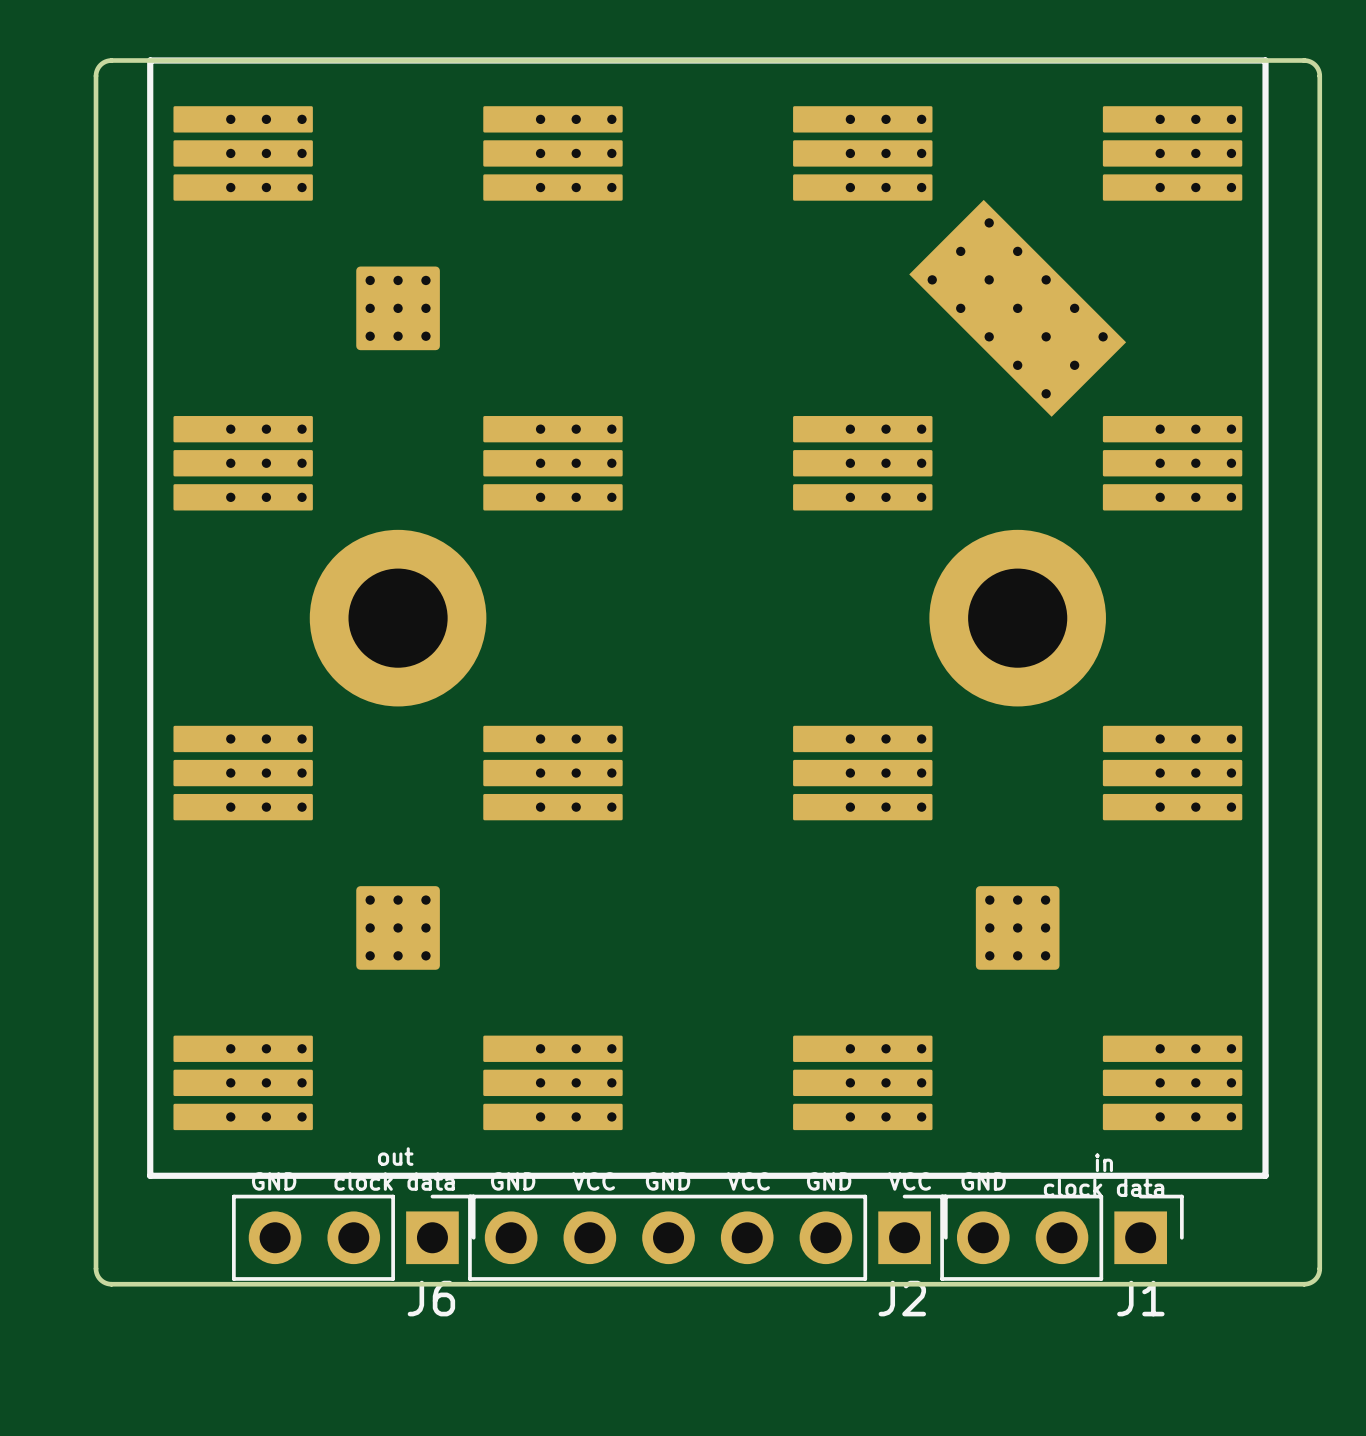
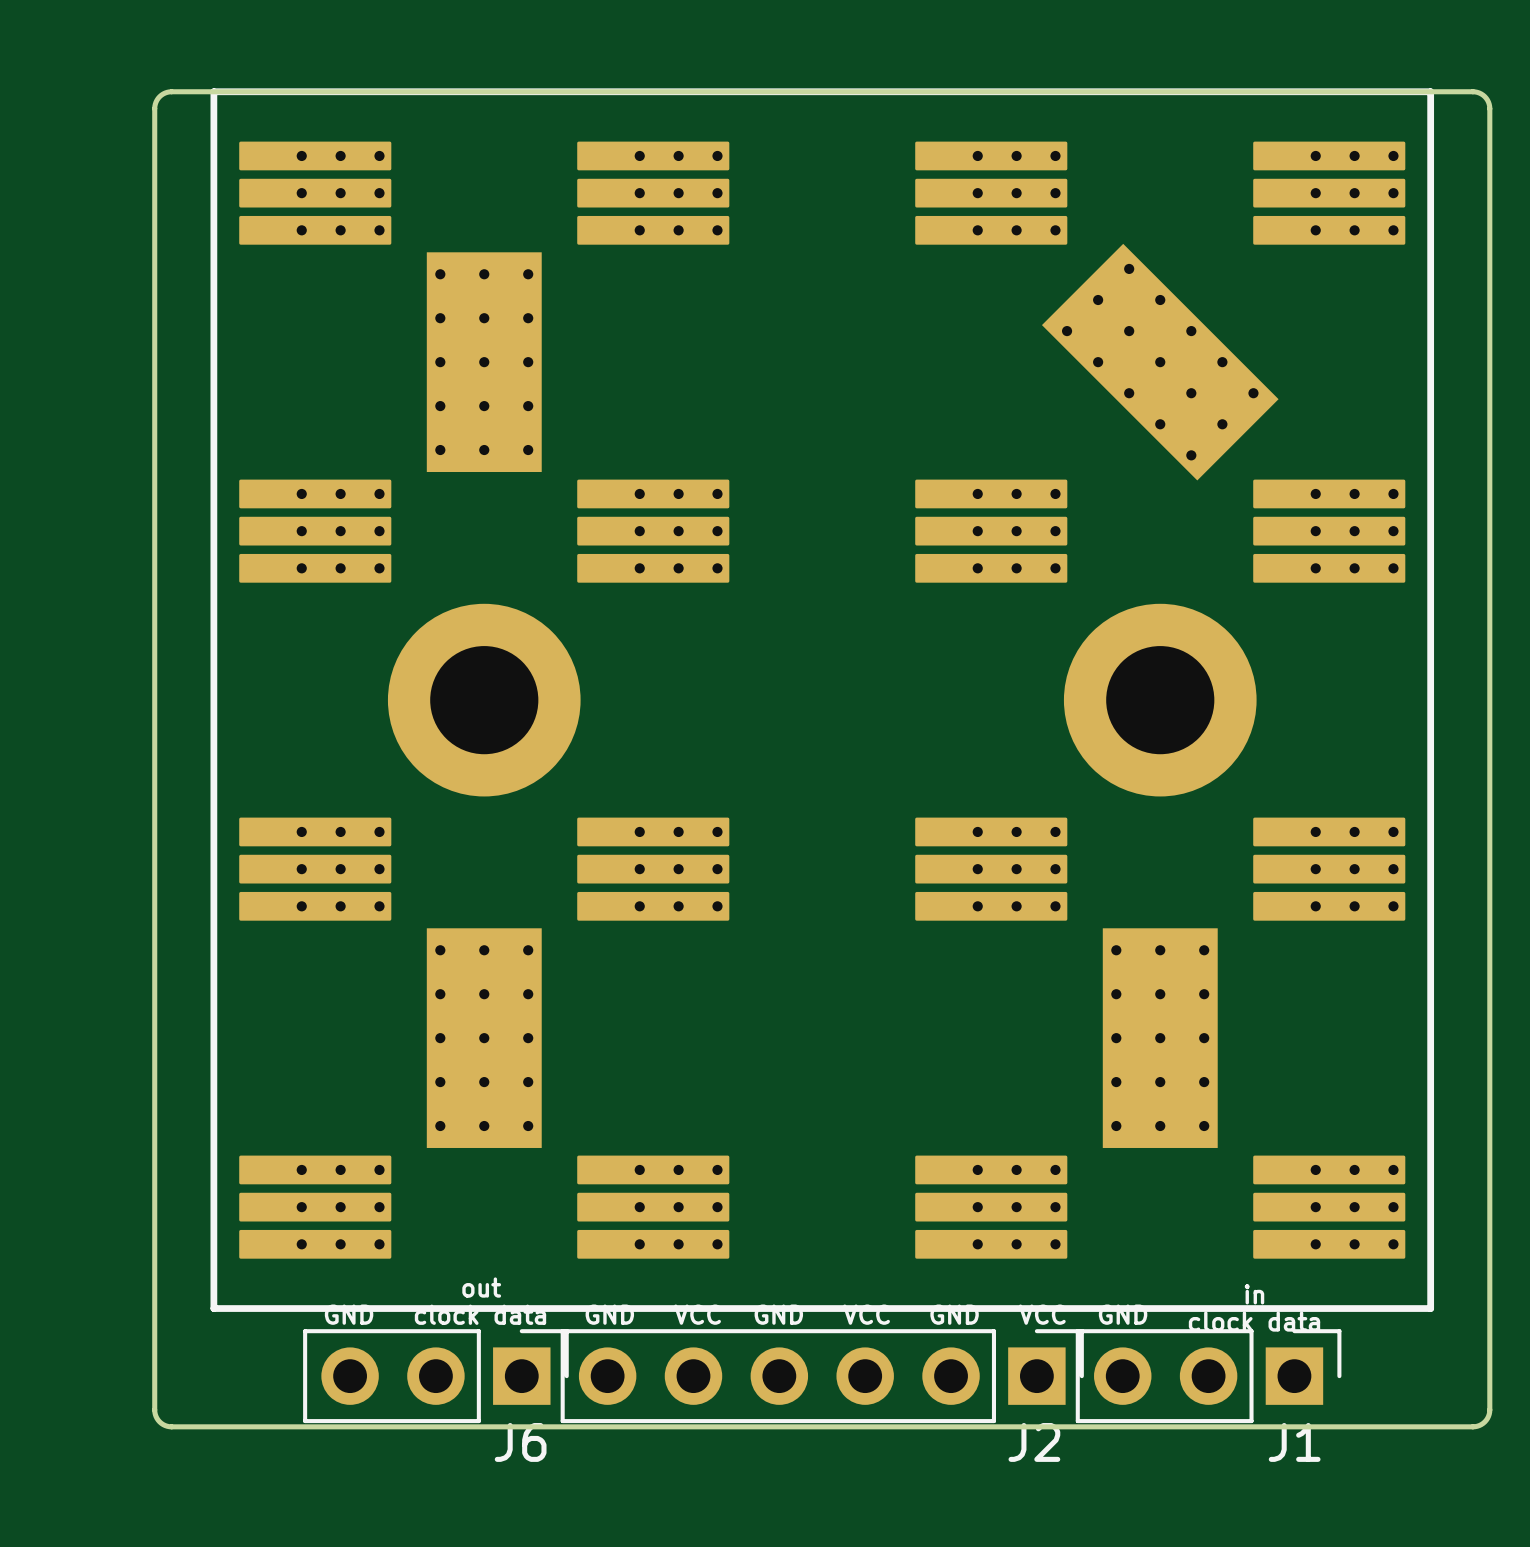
part footprint: [356, 266, 440, 351] -> [426, 252, 542, 472]
part footprint: [356, 886, 440, 970] -> [426, 928, 542, 1148]
part footprint: [975, 886, 1060, 970] -> [1102, 928, 1218, 1148]

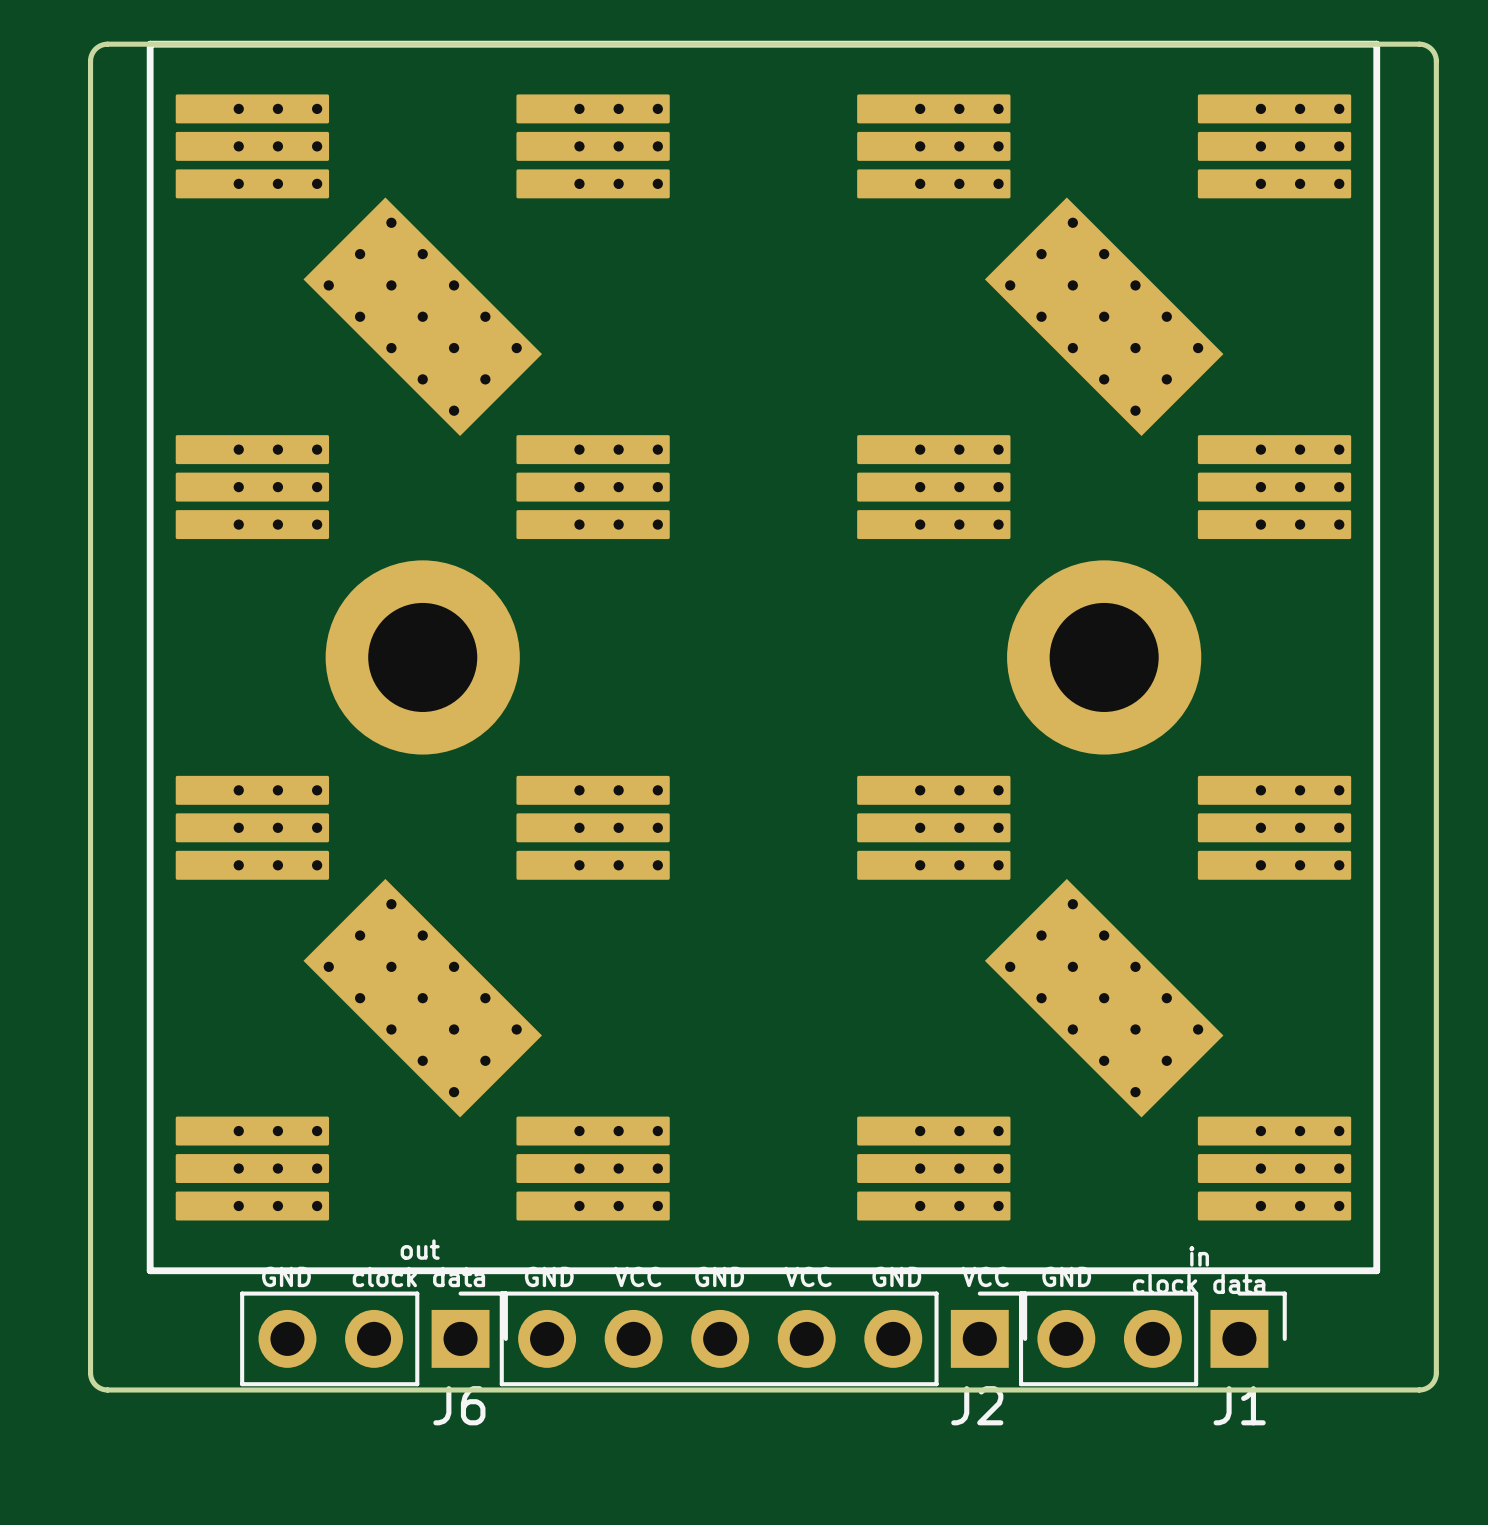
part rotation: 0° (484, 362) -> 45° counterclockwise (422, 316)
part rotation: 0° (484, 1038) -> 45° counterclockwise (422, 998)
part rotation: 0° (1160, 1038) -> 45° counterclockwise (1104, 998)

